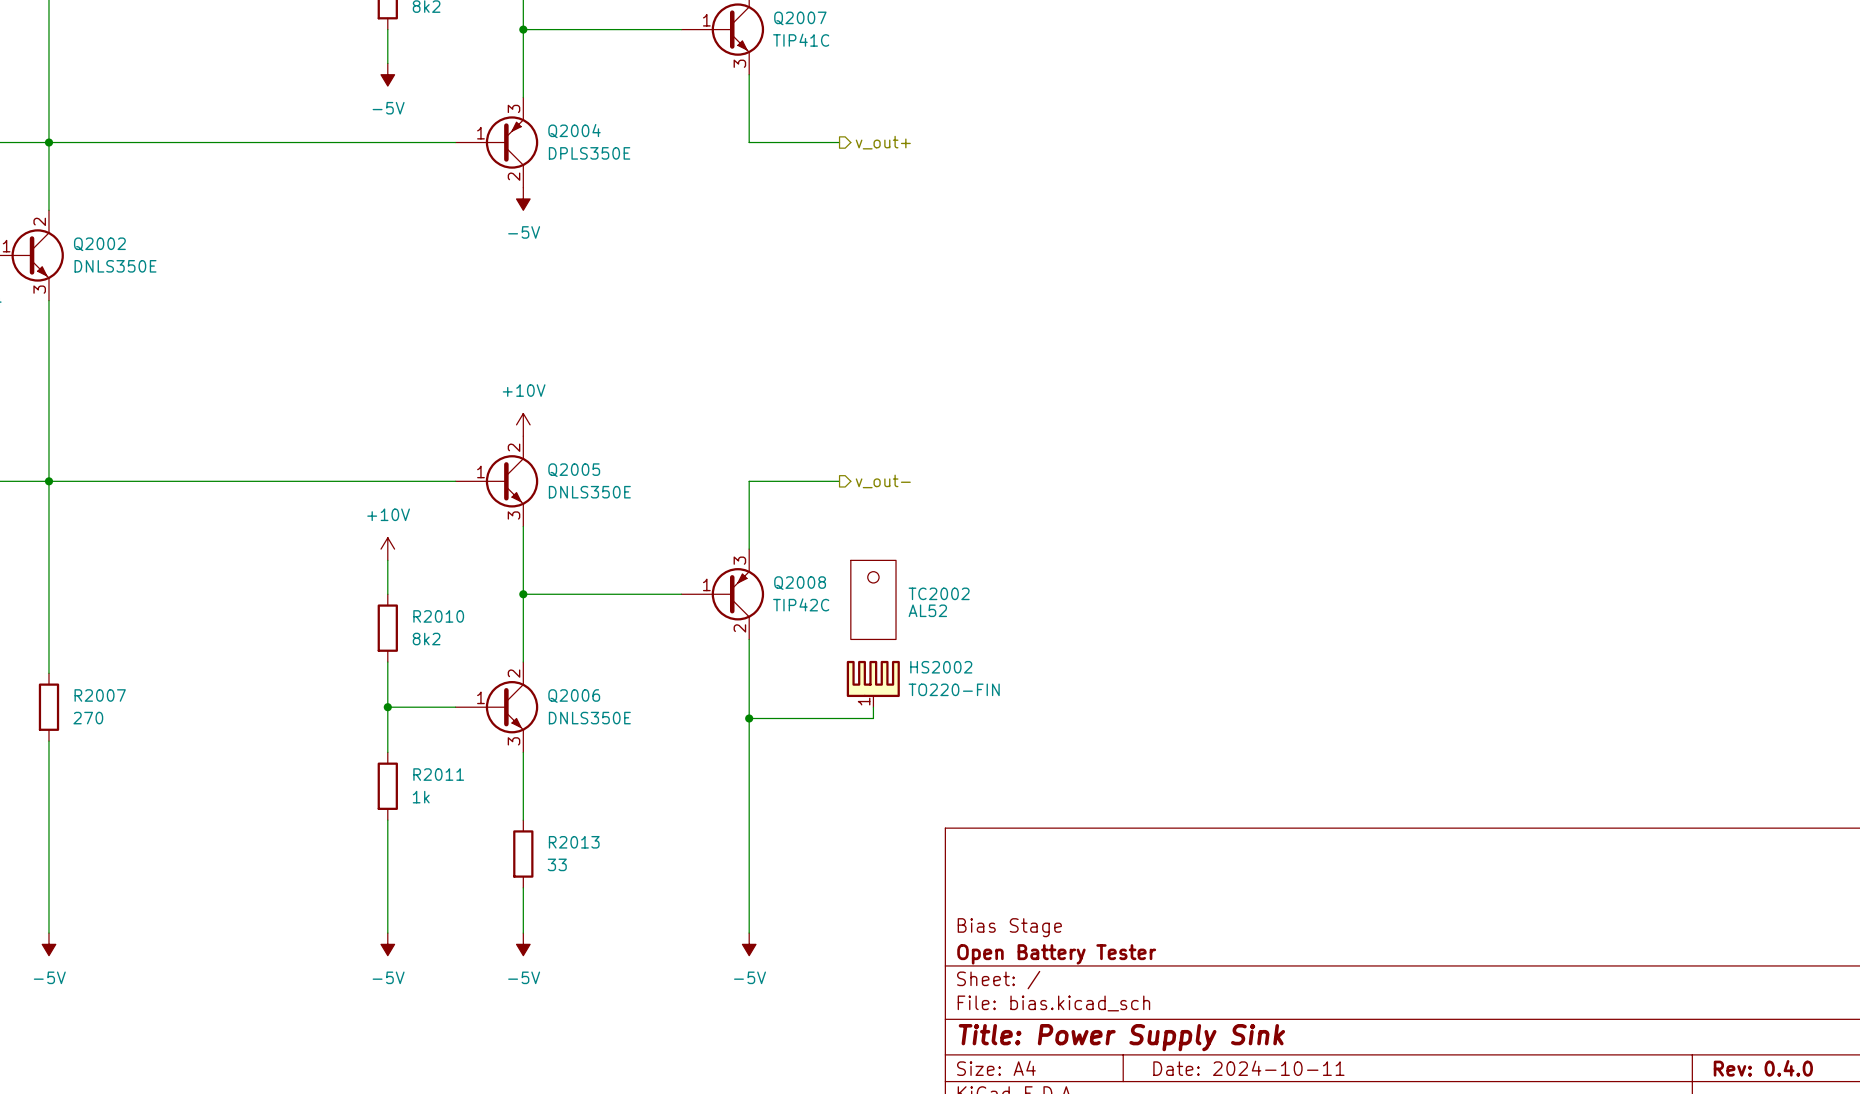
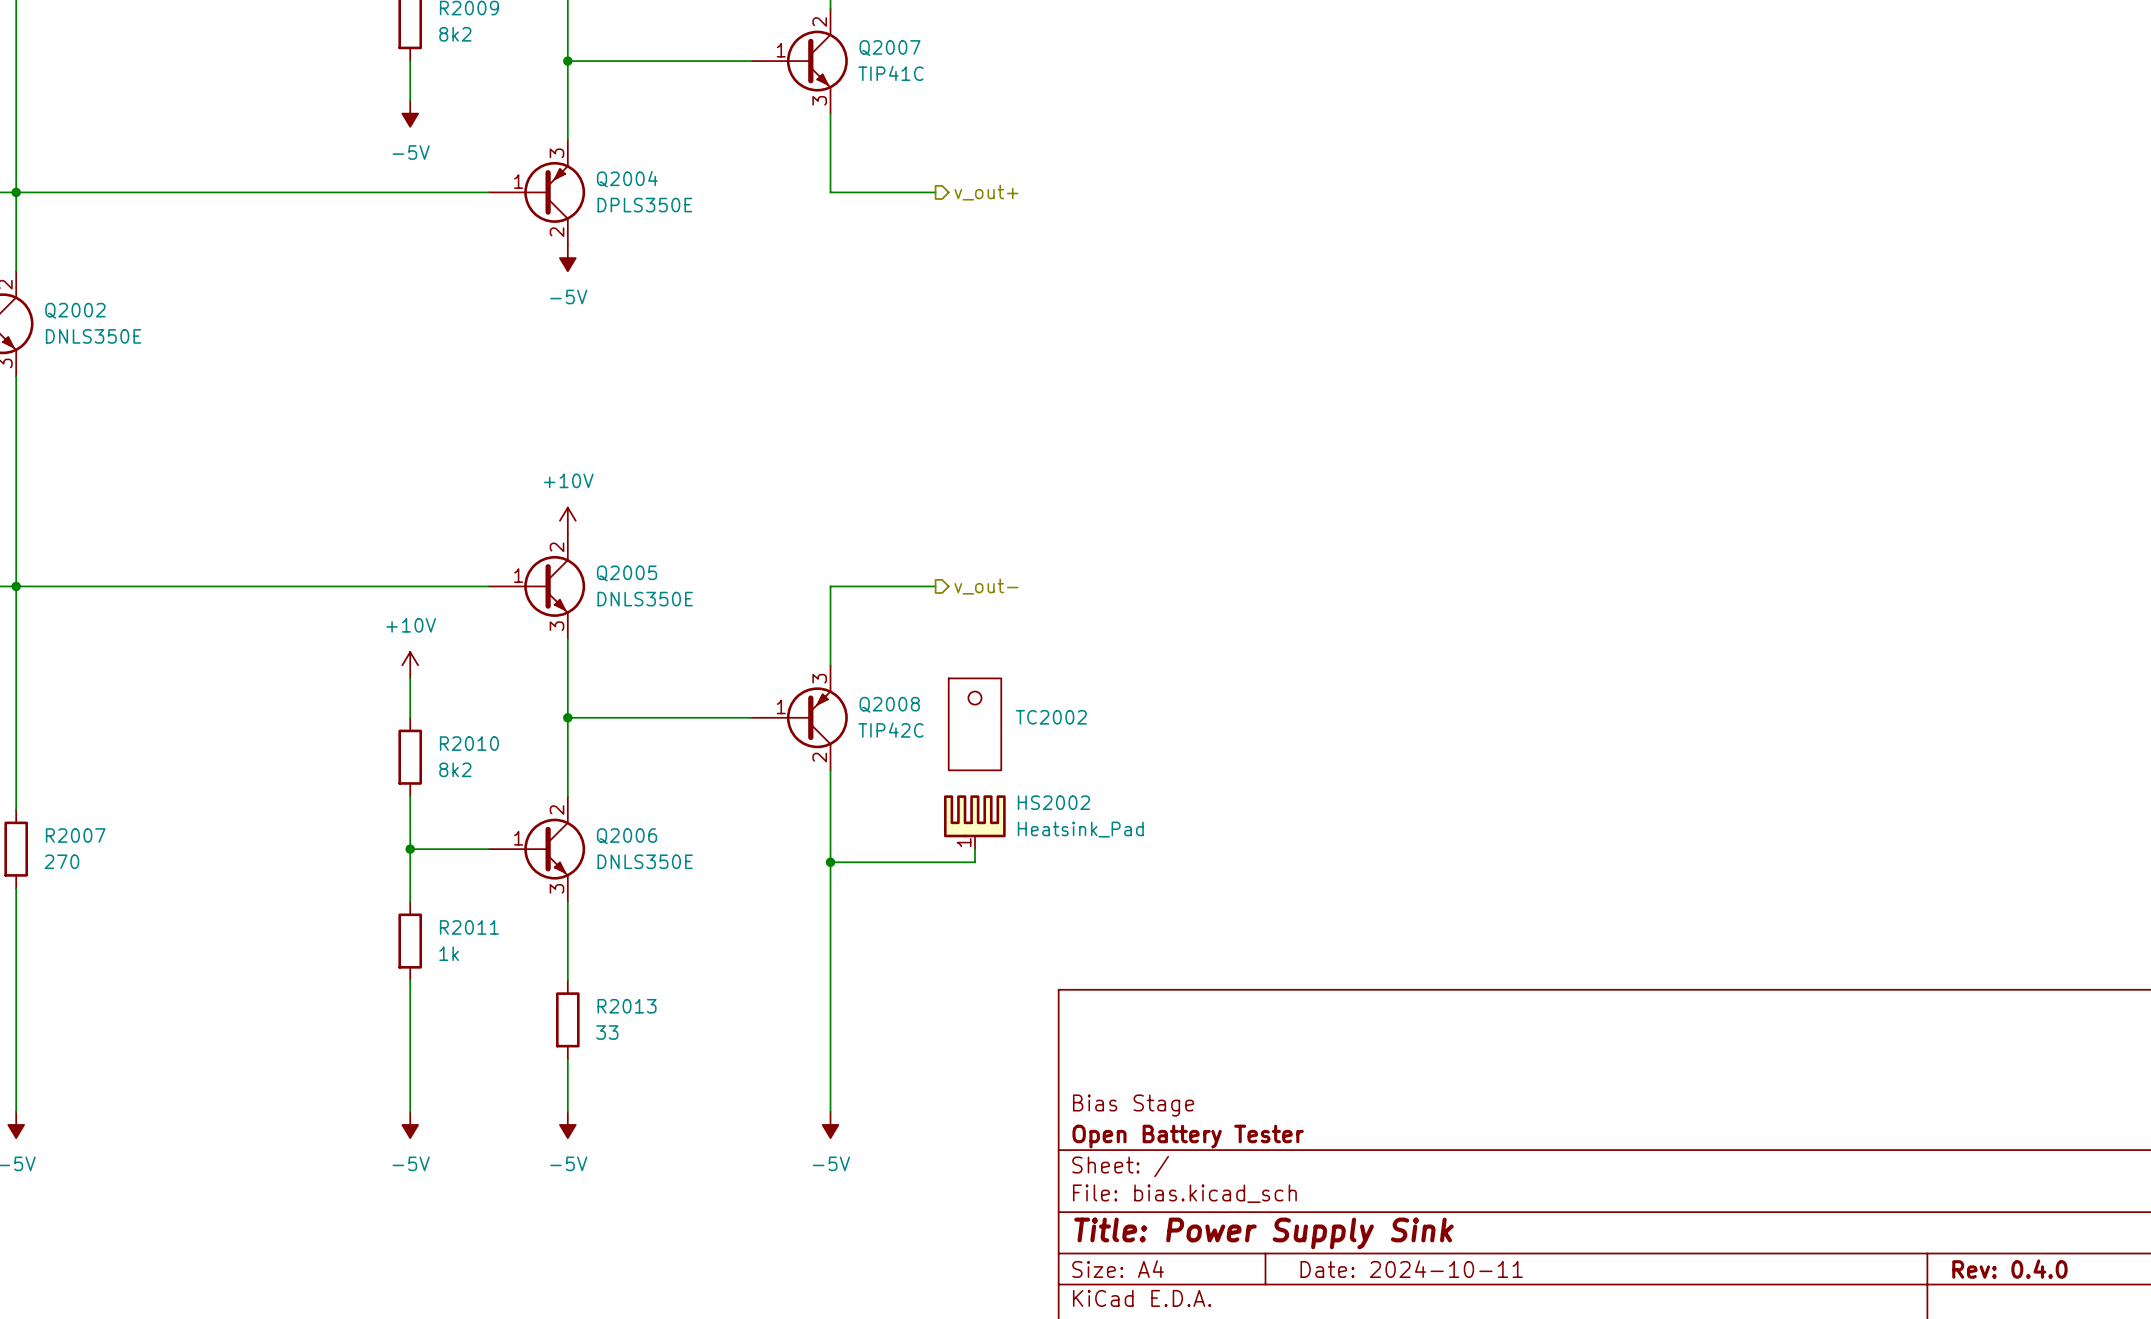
TC2002 value: AL52 (927, 610) -> none
HS2002 value: TO220-FIN (954, 689) -> Heatsink_Pad (1080, 829)

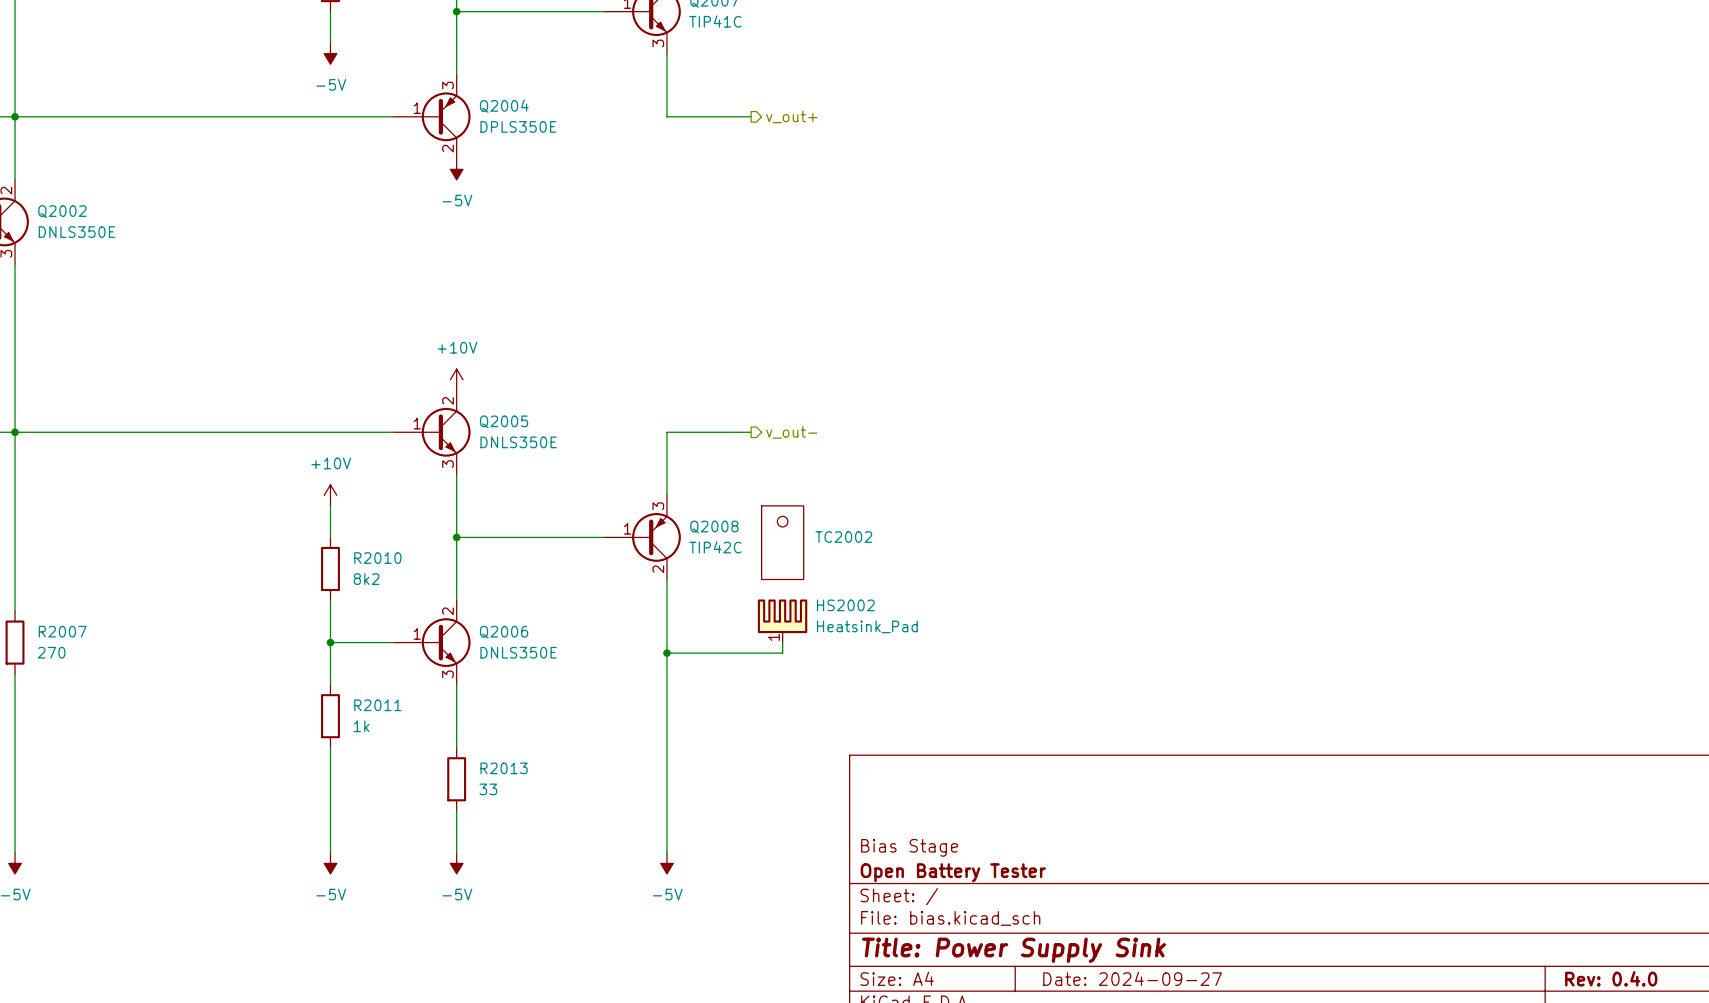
title block: Date: 2024-10-11 (1411, 1269) -> Date: 2024-09-27 (1132, 978)

